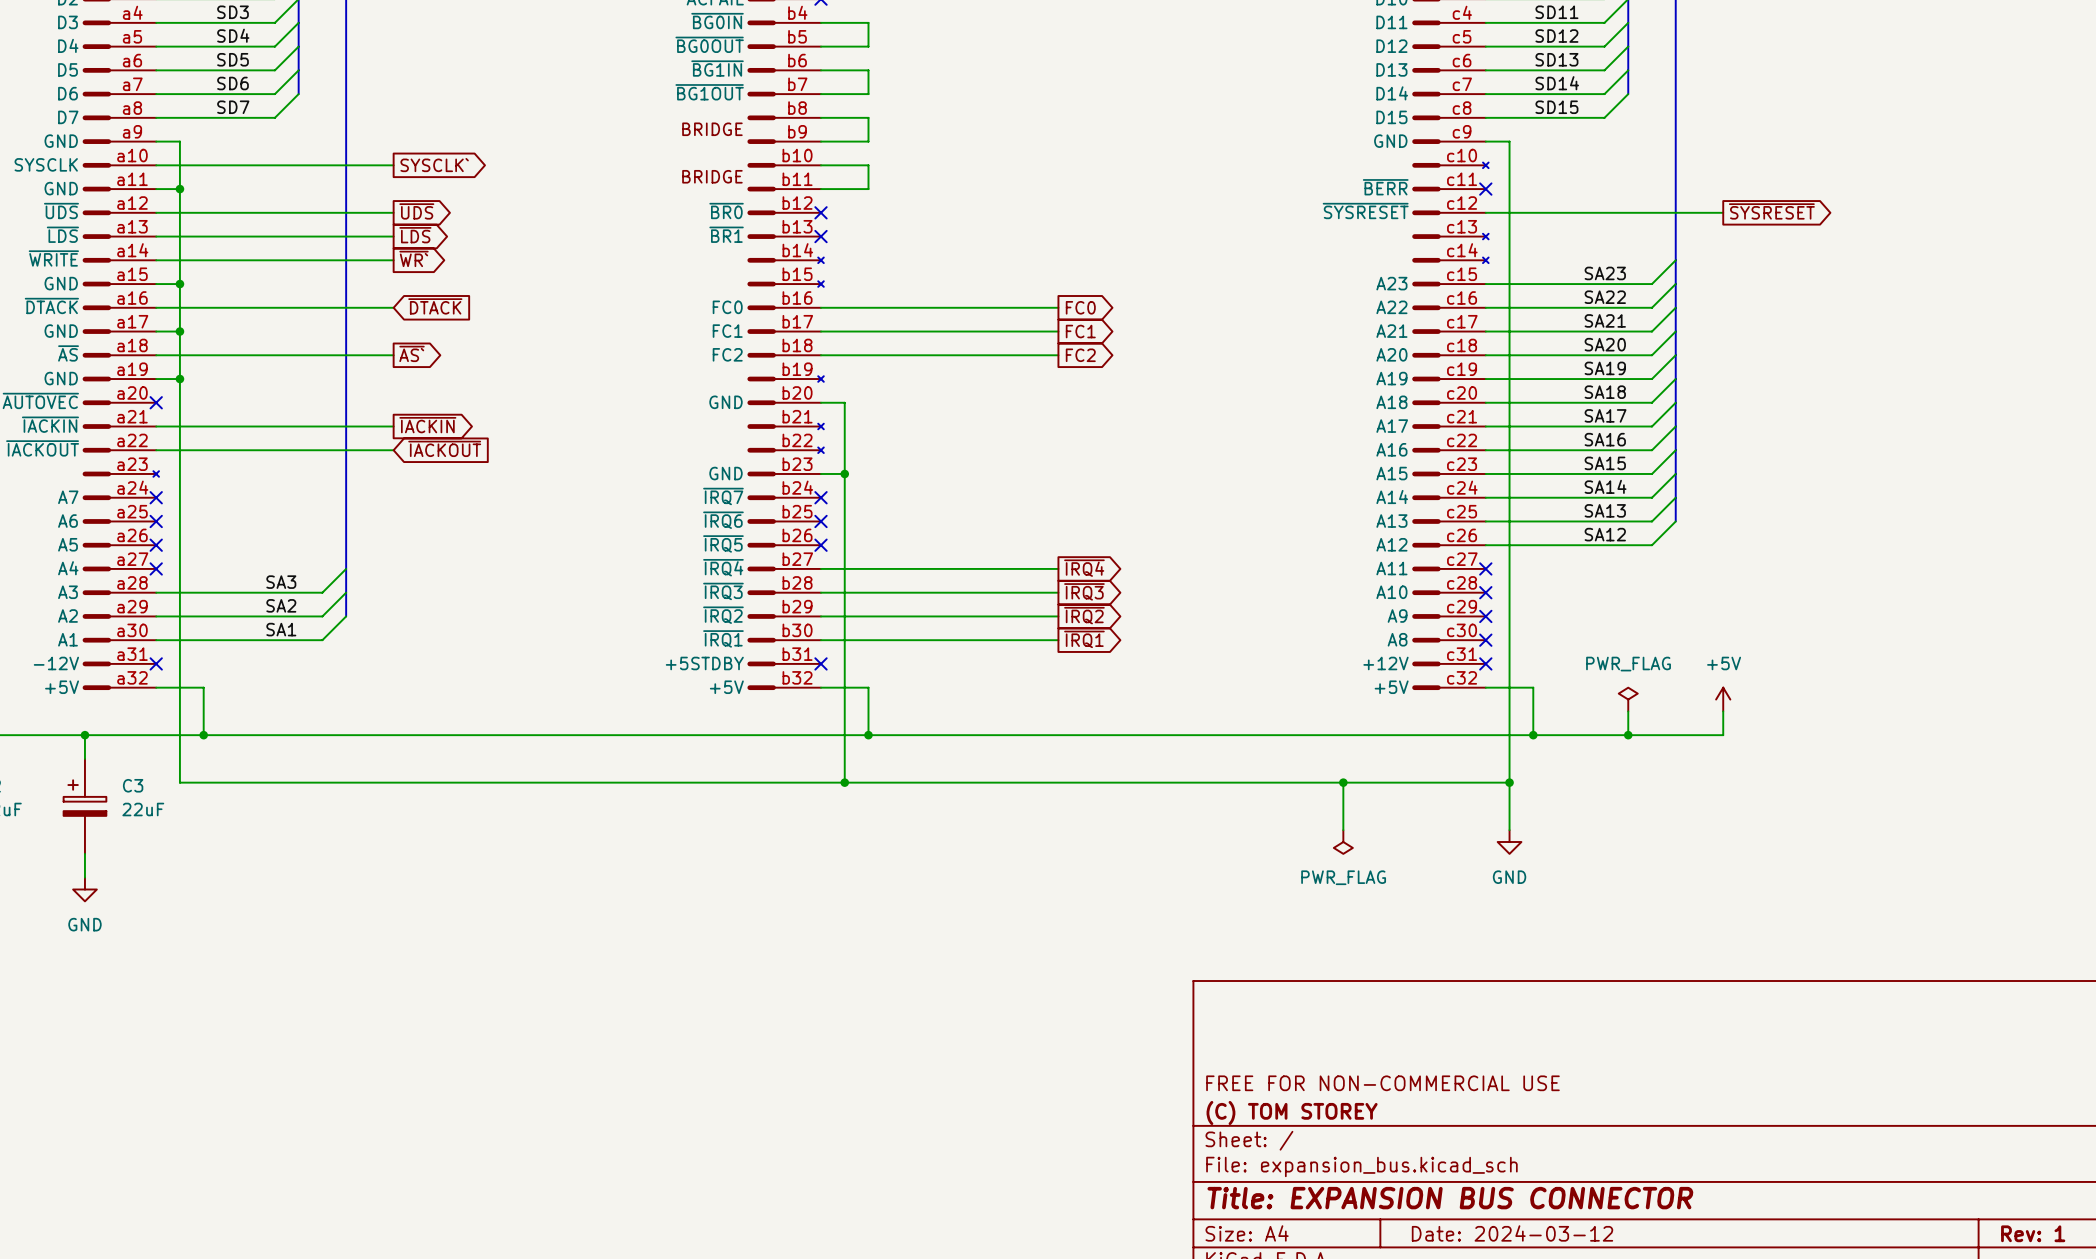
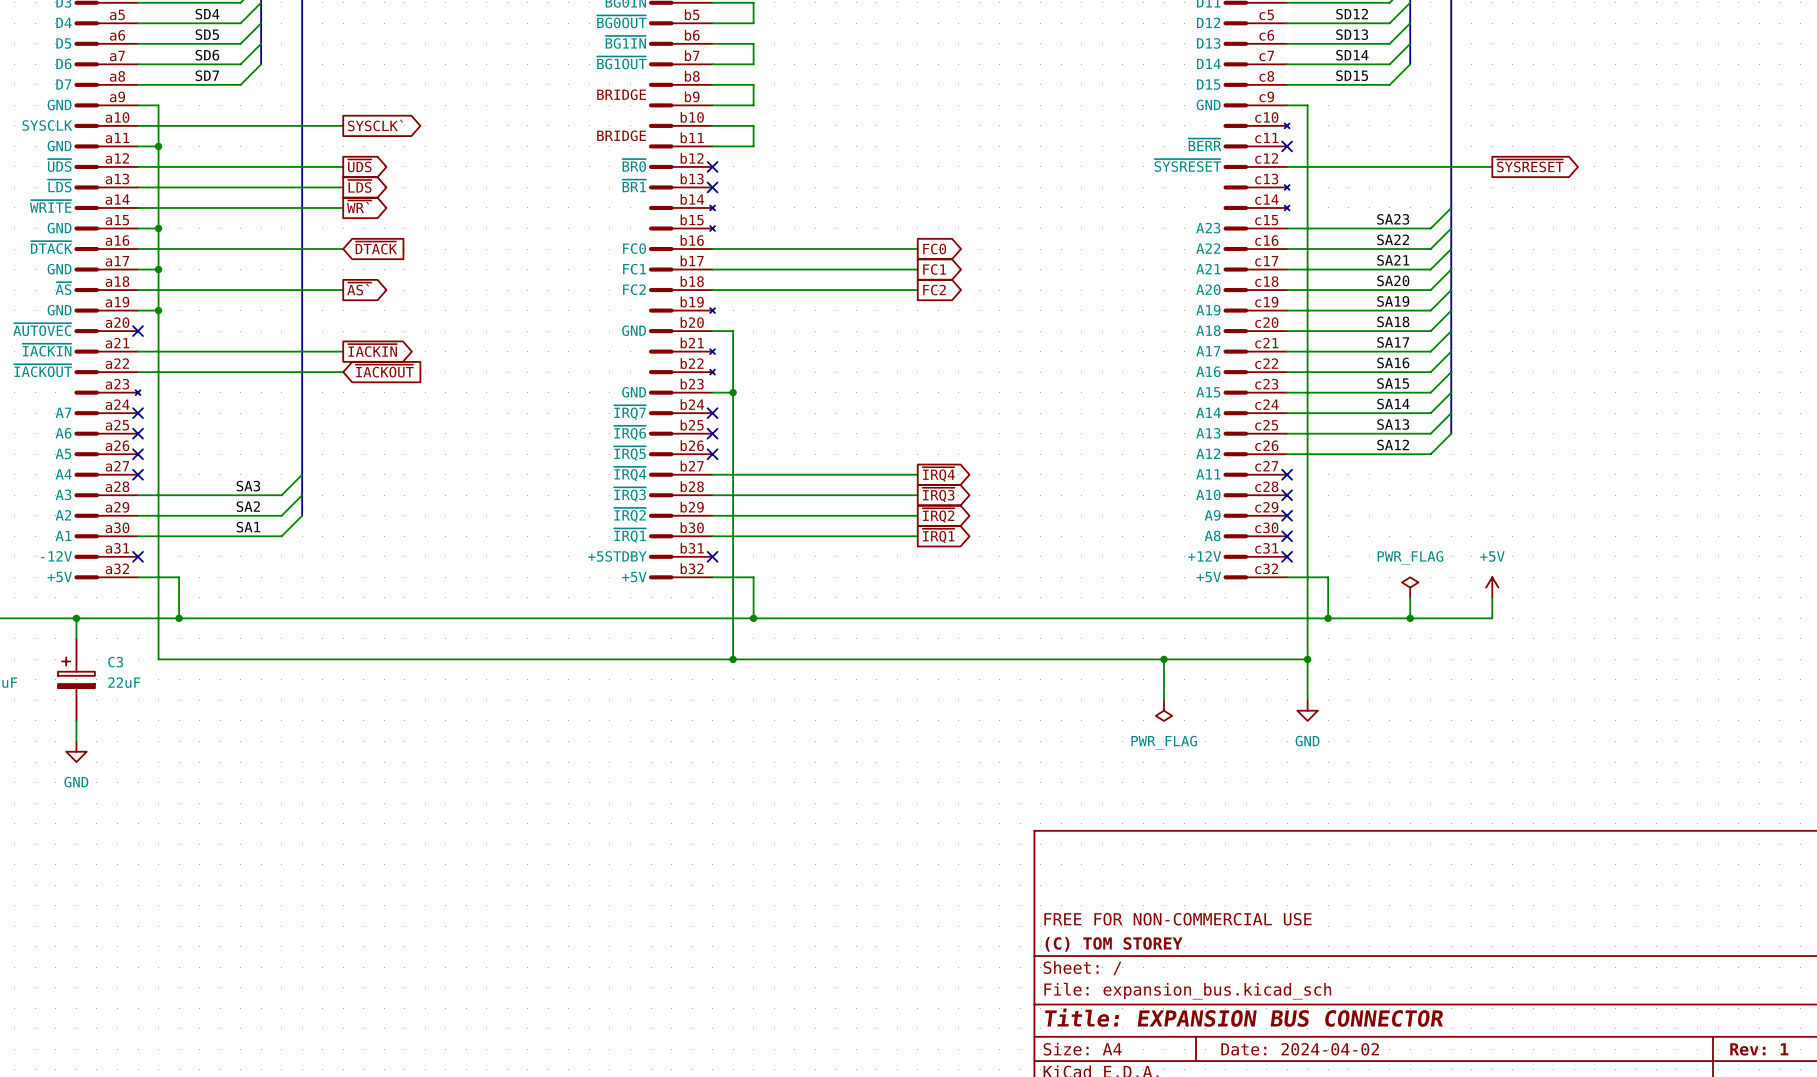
title block: Date: 2024-03-12 (1512, 1233) -> Date: 2024-04-02 (1300, 1049)

